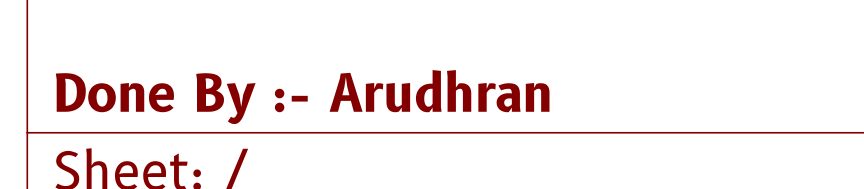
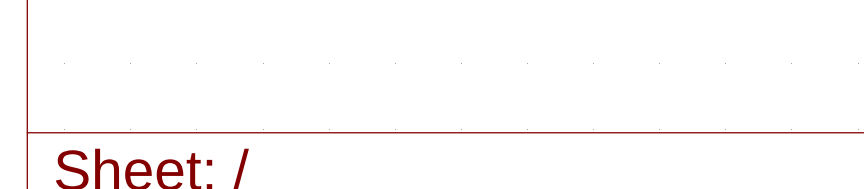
title block: Done By :- Arudhran (302, 97) -> none

